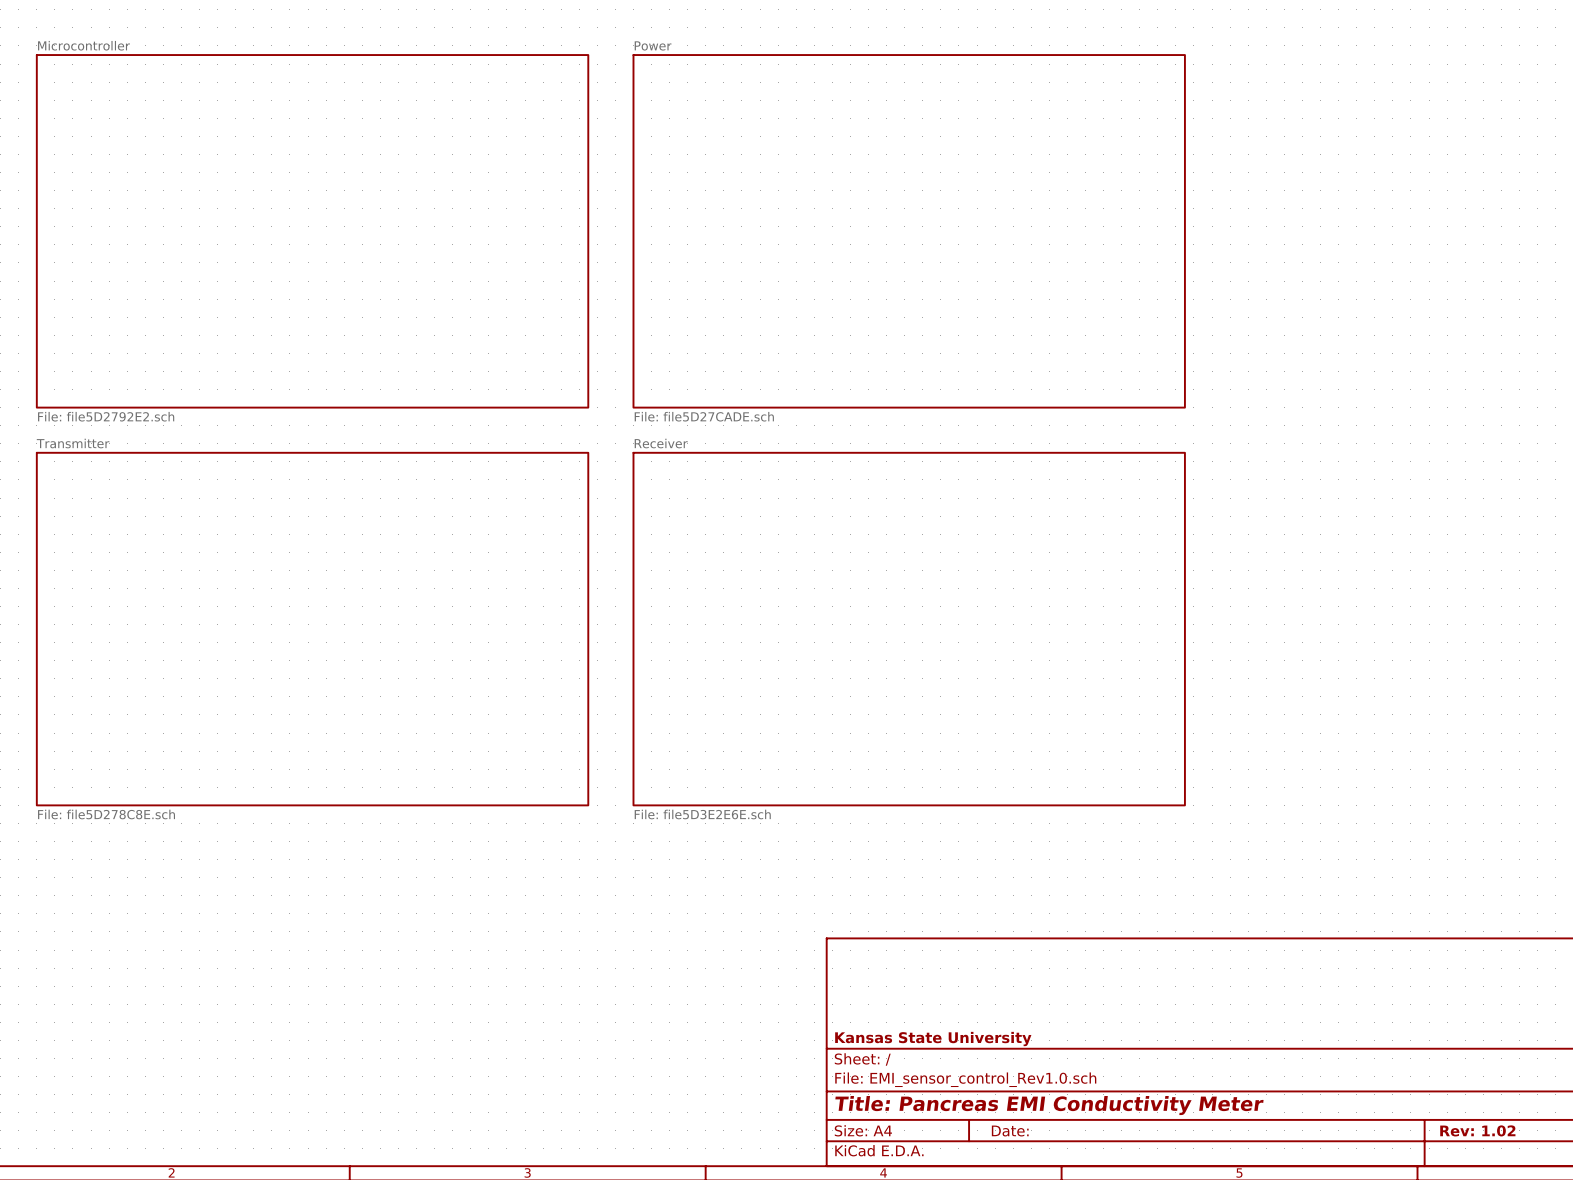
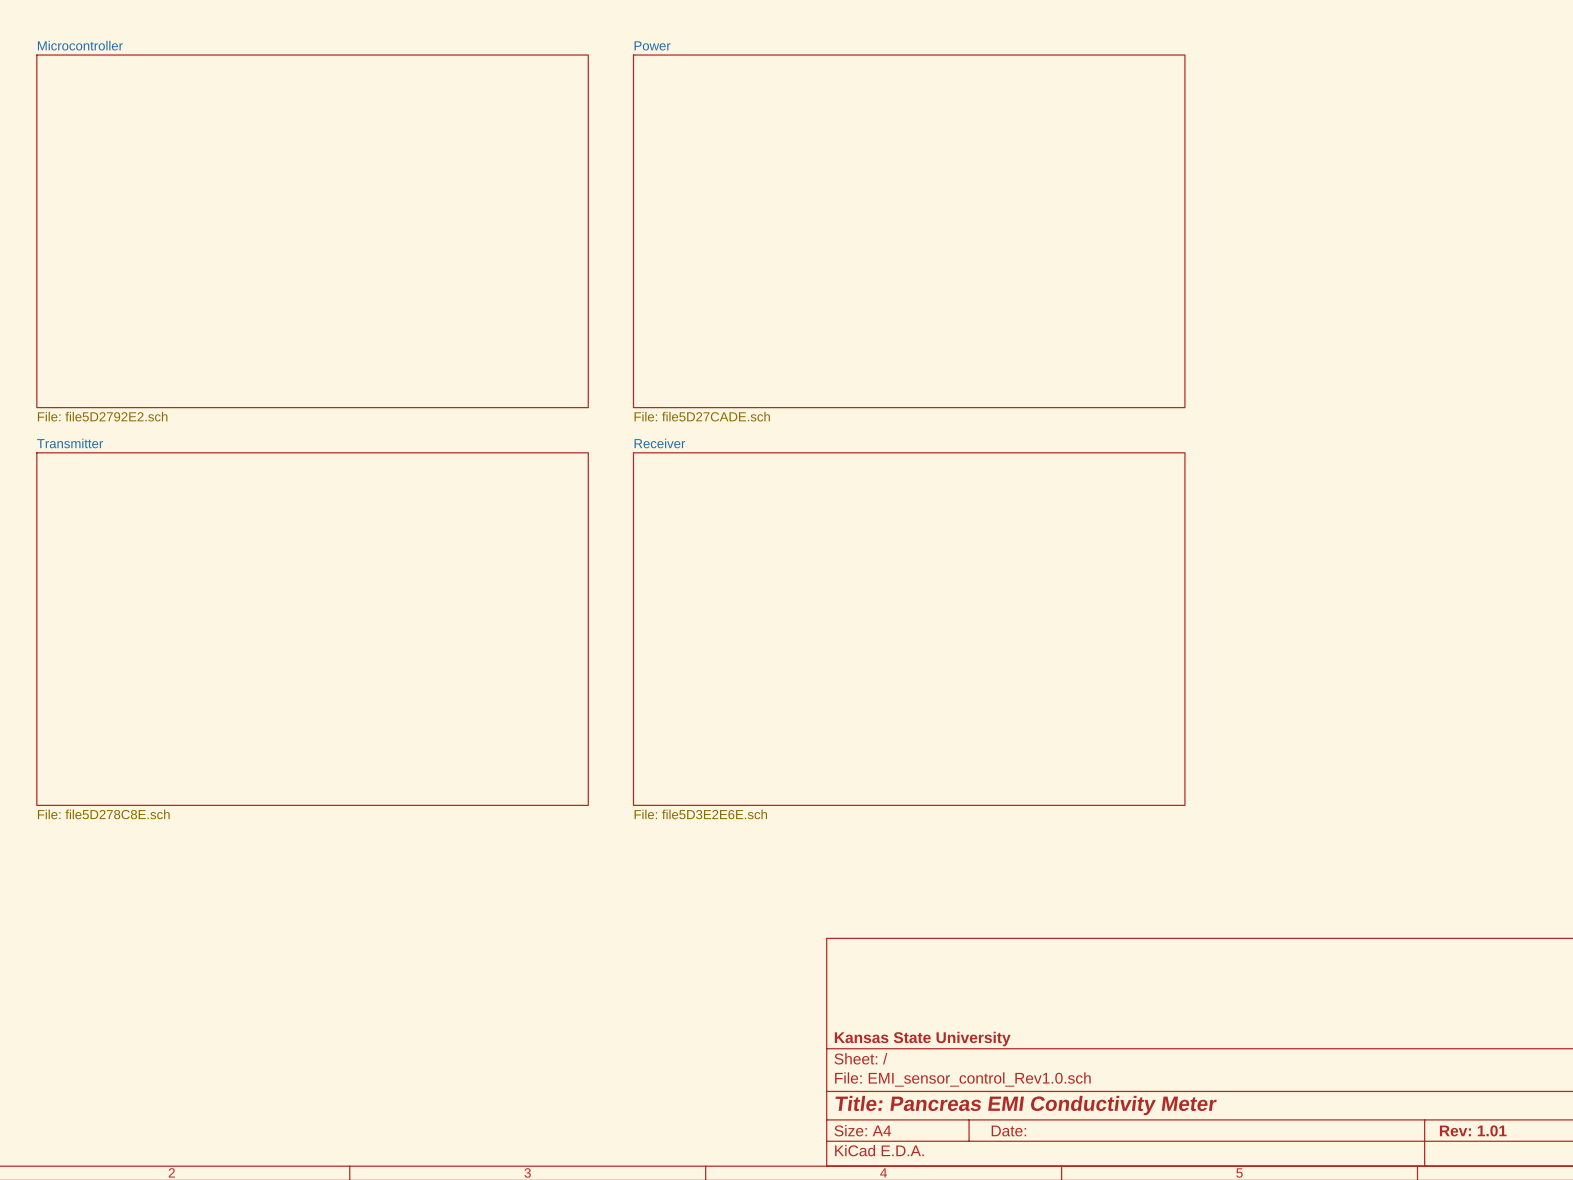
title block: Rev: 1.02 (1477, 1130) -> Rev: 1.01 (1473, 1130)

